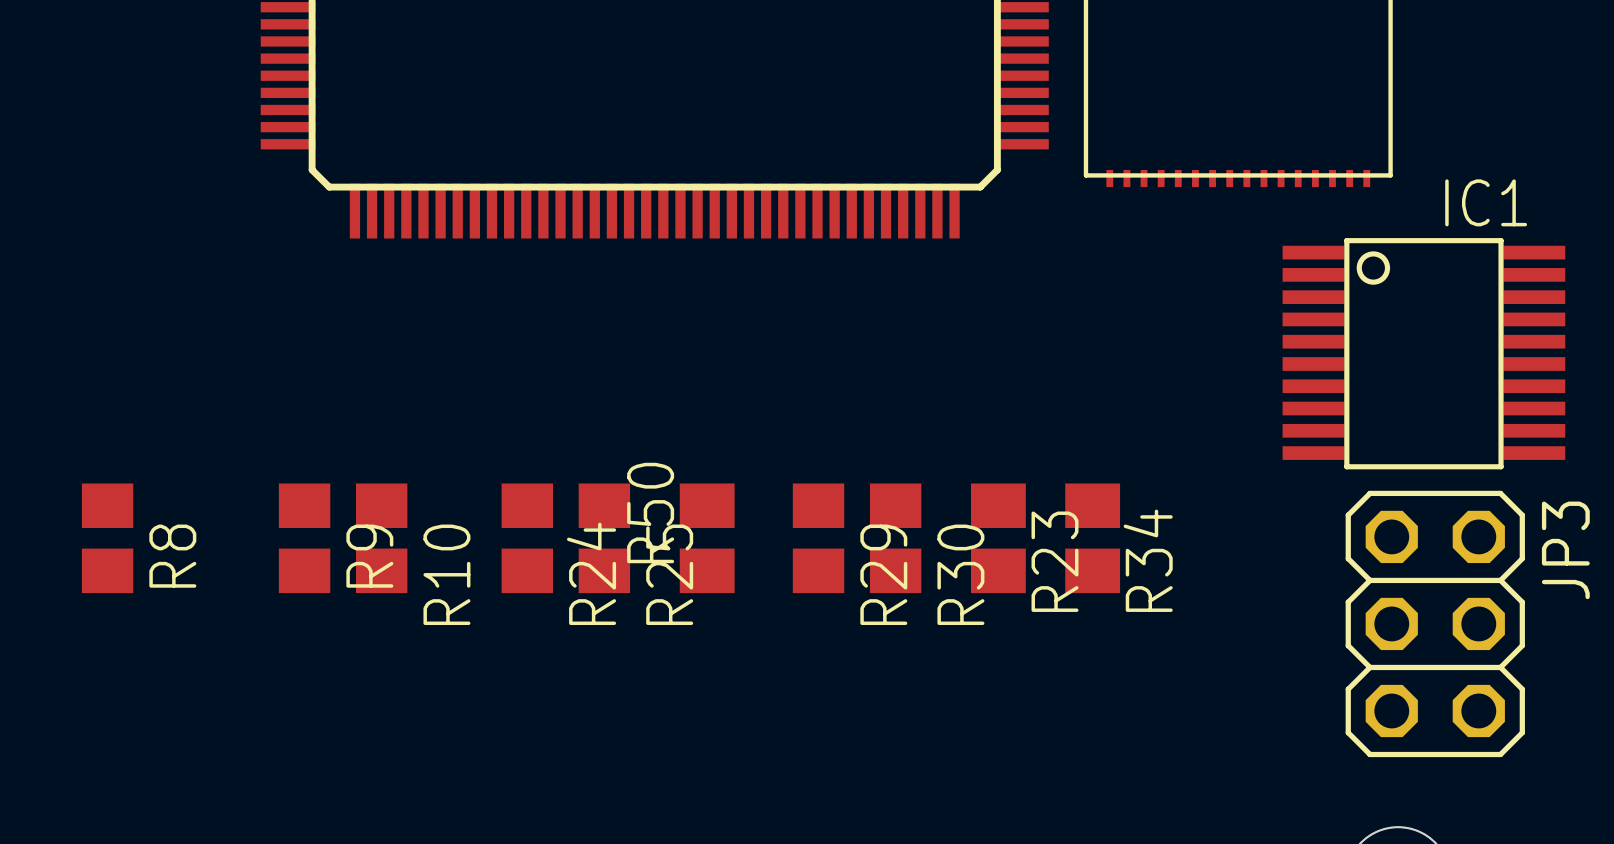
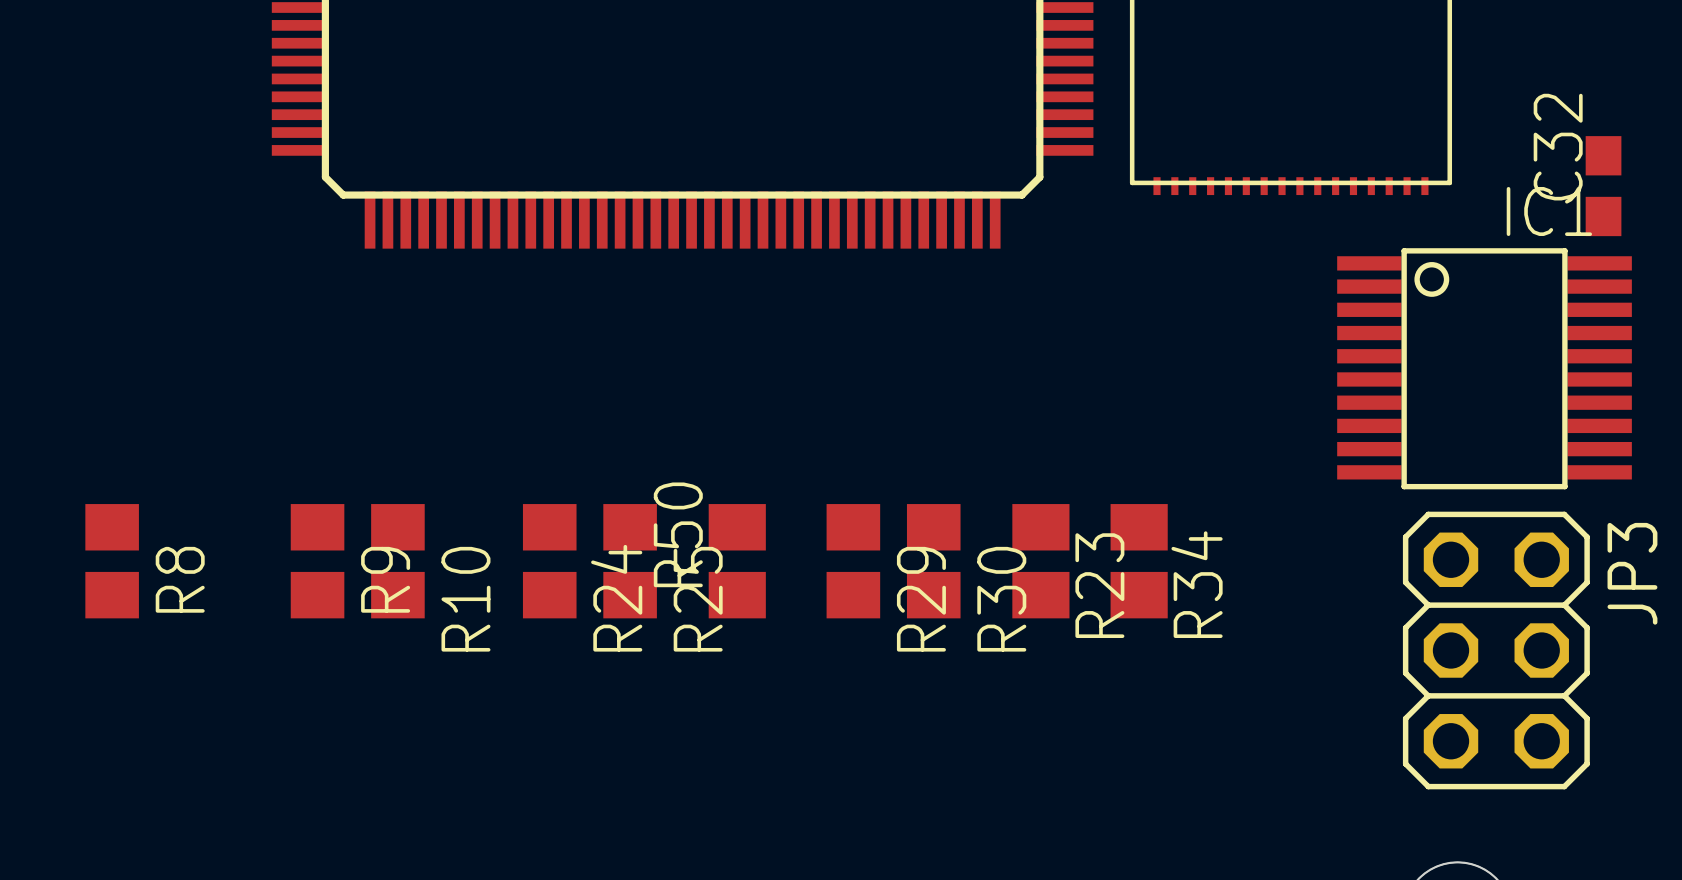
C32: none -> (1603, 186)

